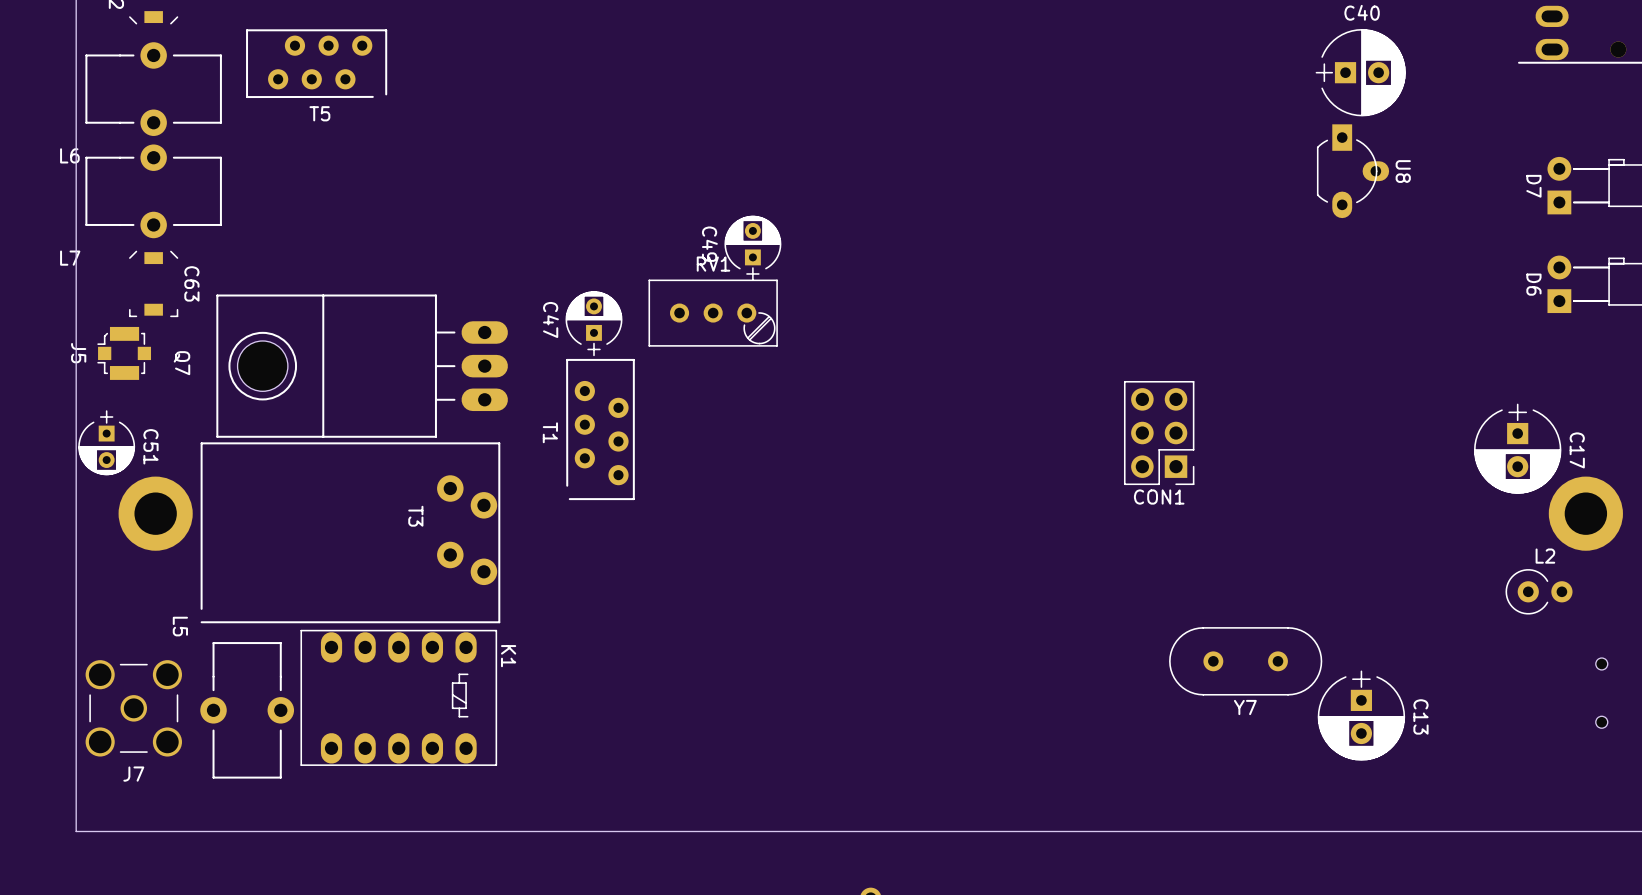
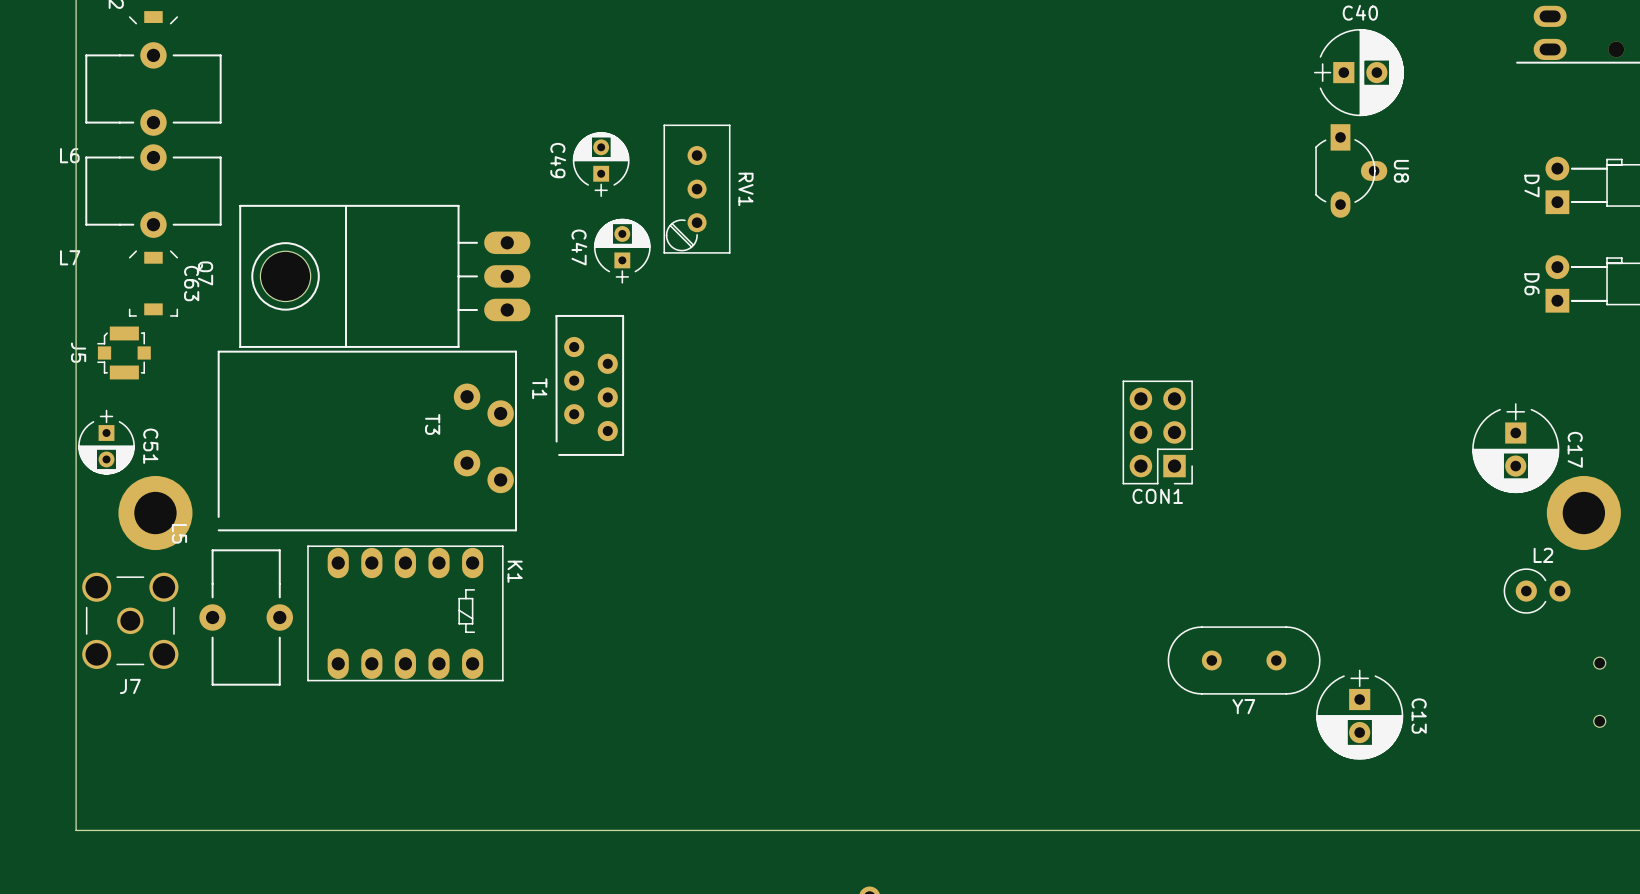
T5: (316, 63) -> none
C49 position: (752, 248) -> (601, 164)
RV1 rotation: 0° (713, 313) -> 90° clockwise (696, 189)
RV1 position: (713, 313) -> (696, 189)
C47 position: (593, 323) -> (622, 251)
Q7 position: (362, 366) -> (384, 276)
T1 position: (600, 429) -> (589, 385)
T3 position: (350, 532) -> (367, 441)
K1 position: (398, 697) -> (405, 613)
J7 position: (133, 708) -> (130, 620)
L5 position: (247, 710) -> (246, 617)

